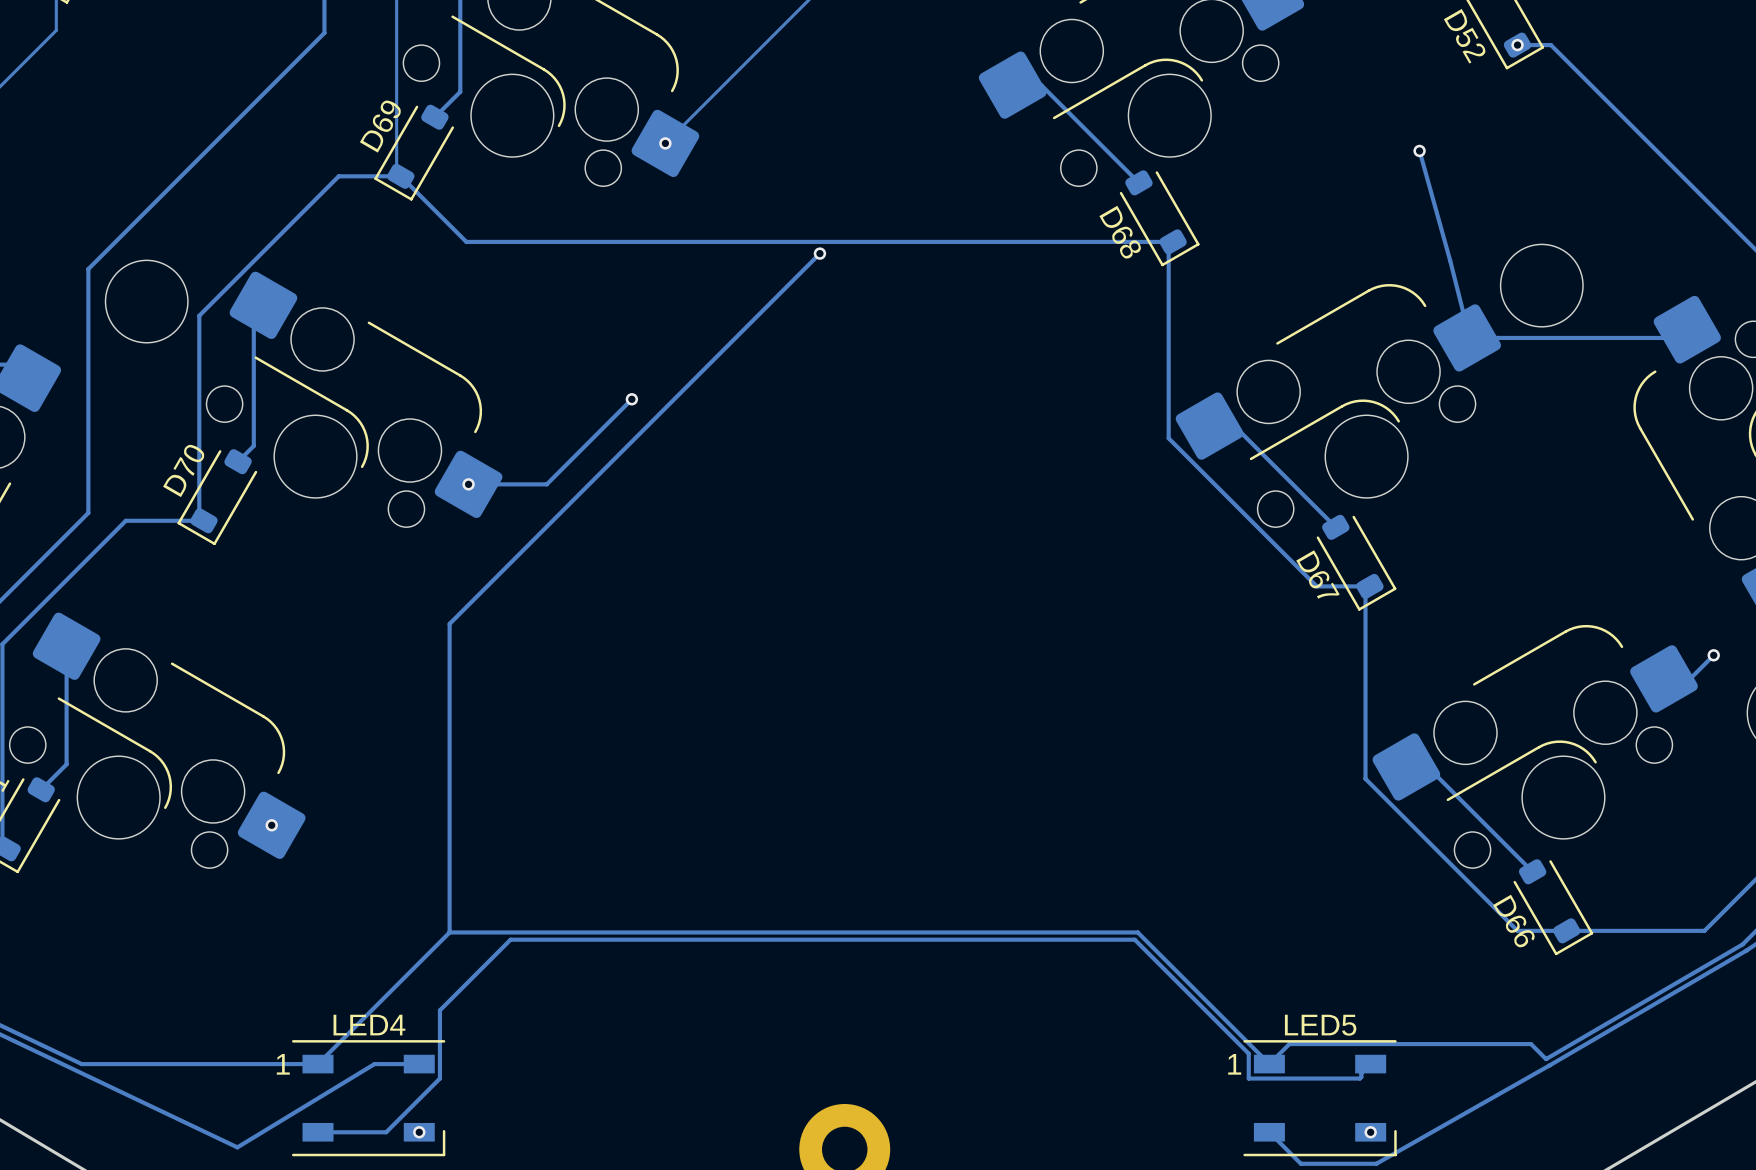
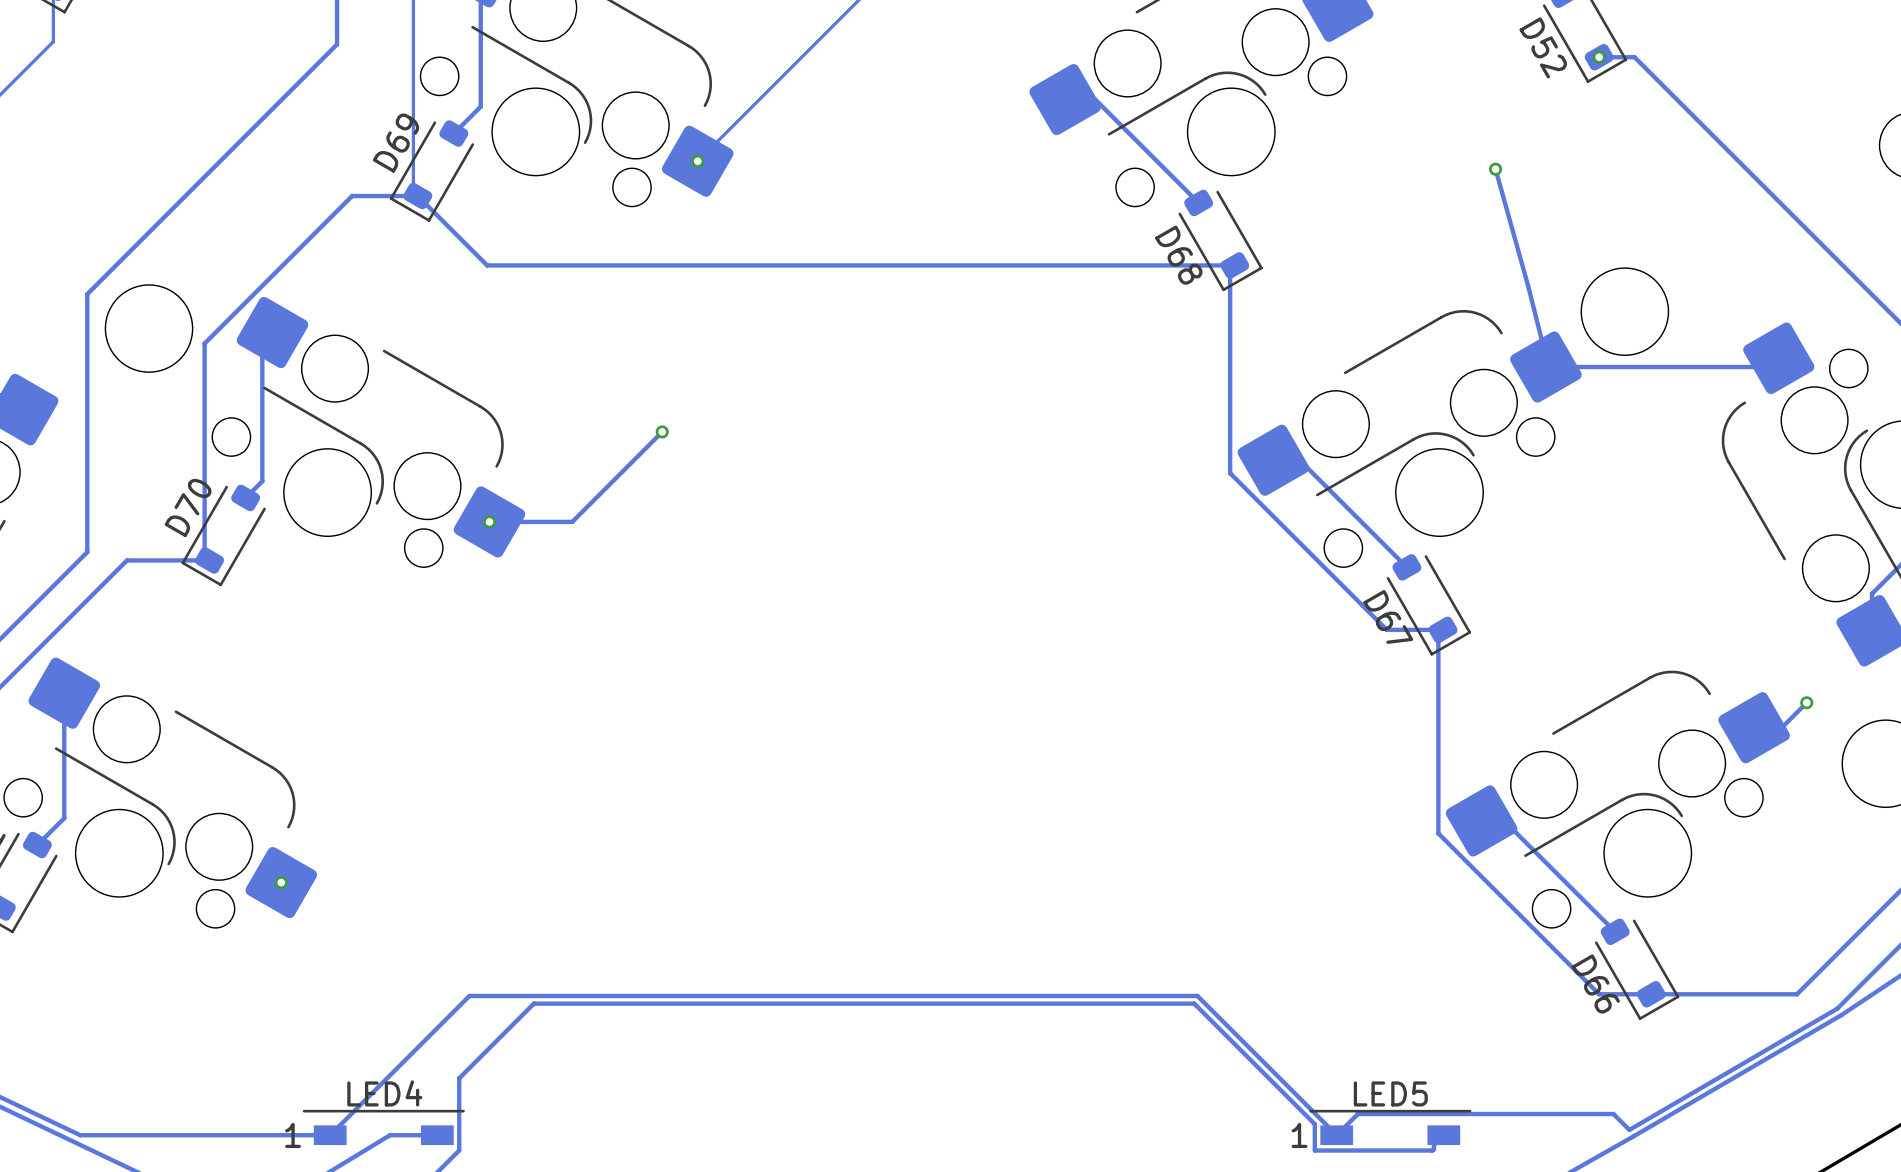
track: (819, 253) (449, 623) (449, 932) -> none
via: (819, 253) -> none

